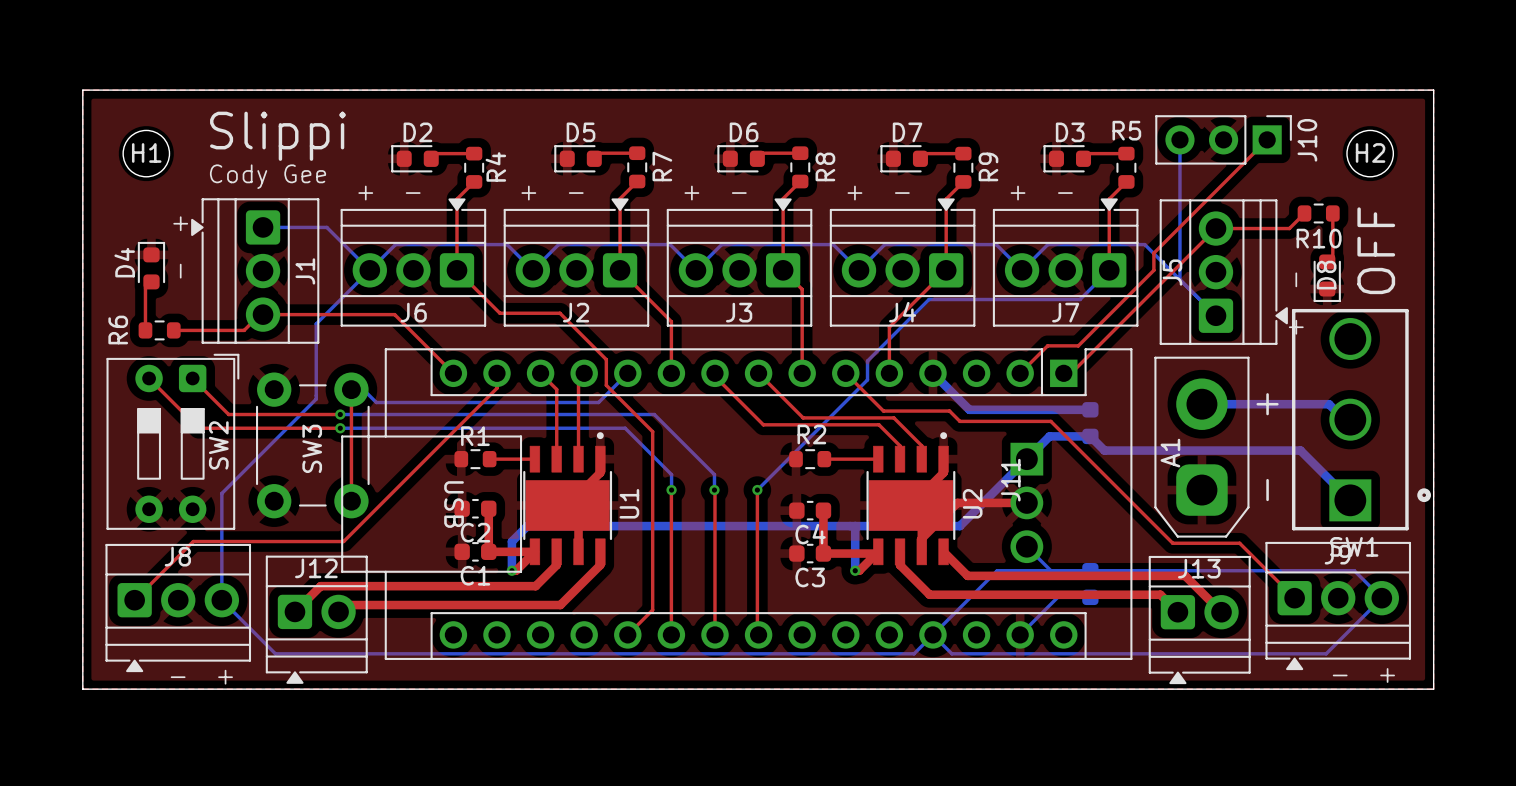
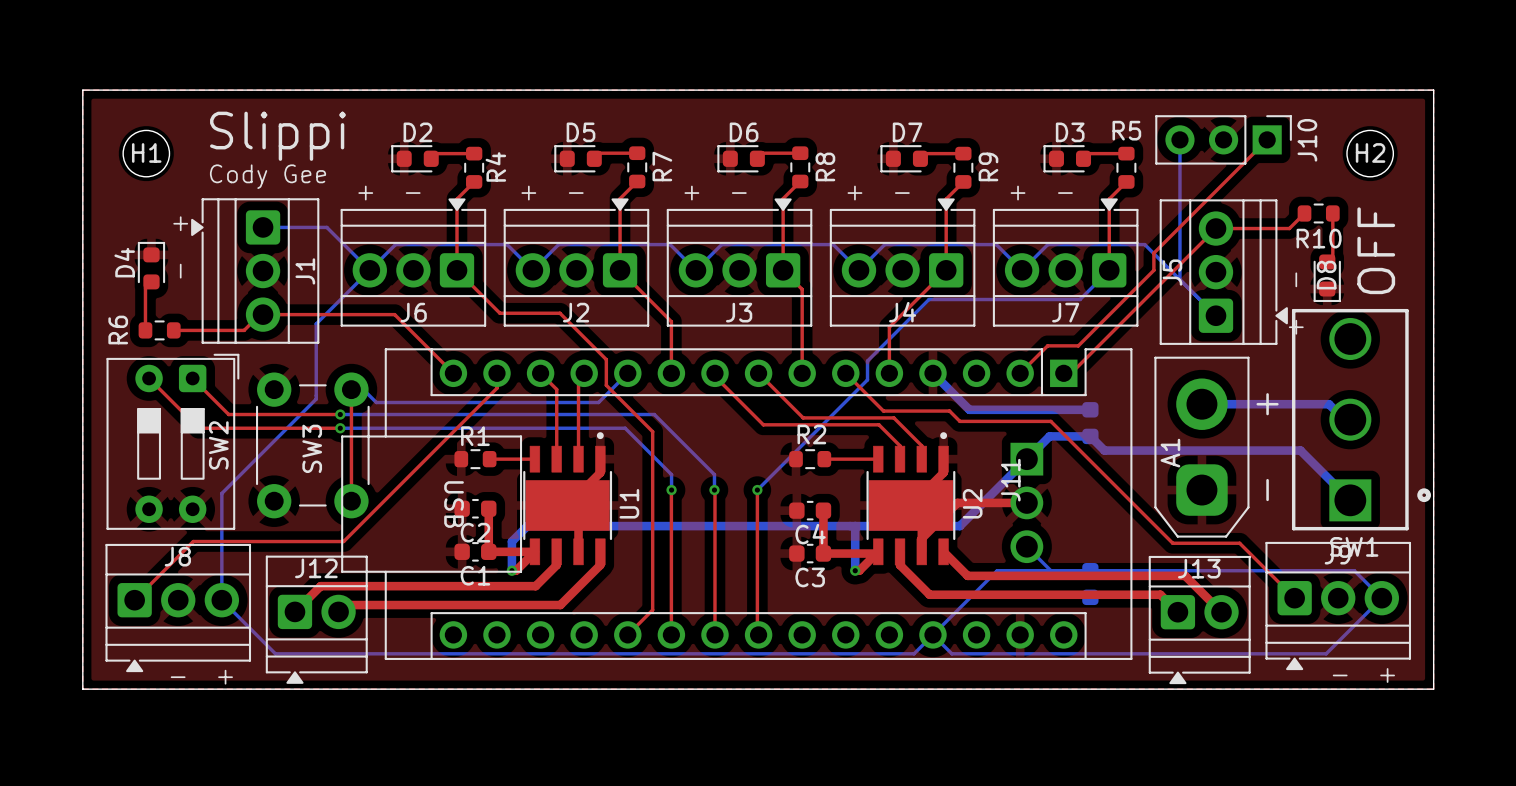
bottom track: (1090, 597) (1057, 597) (1020, 634) -> none

